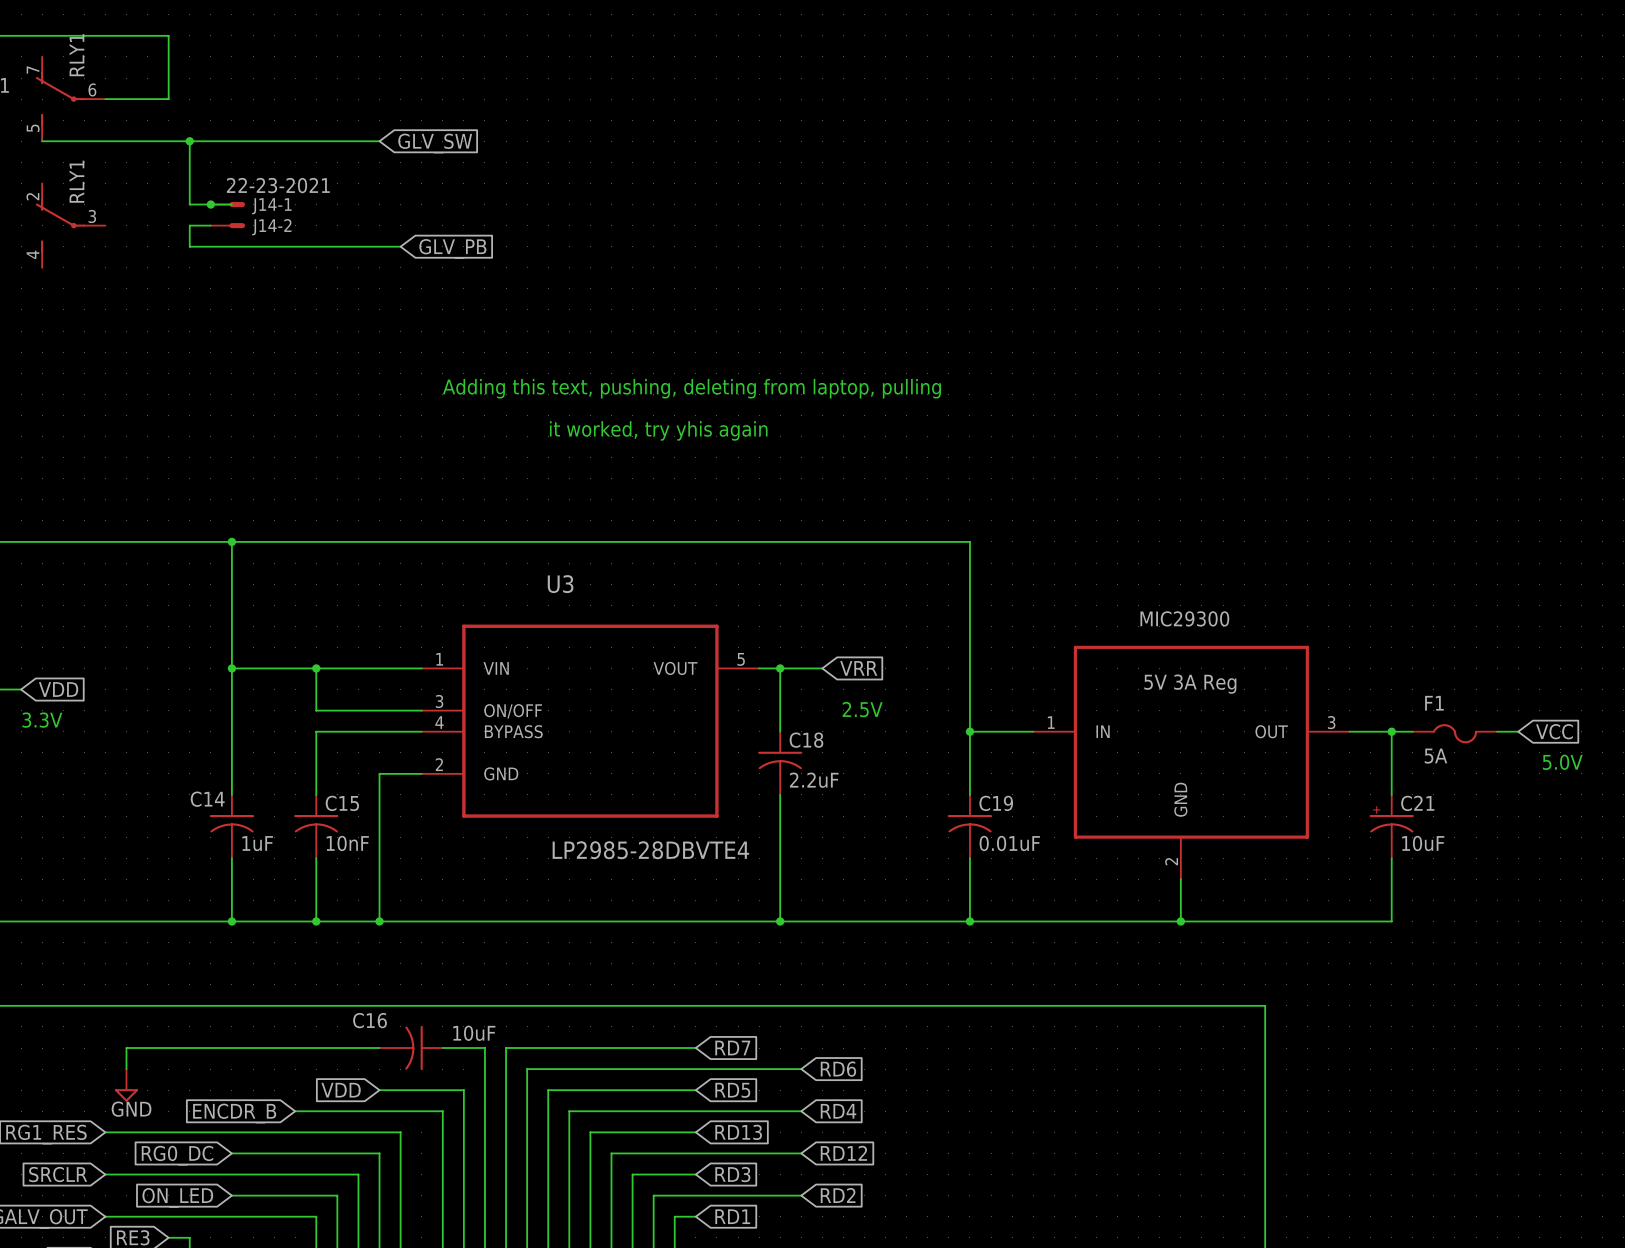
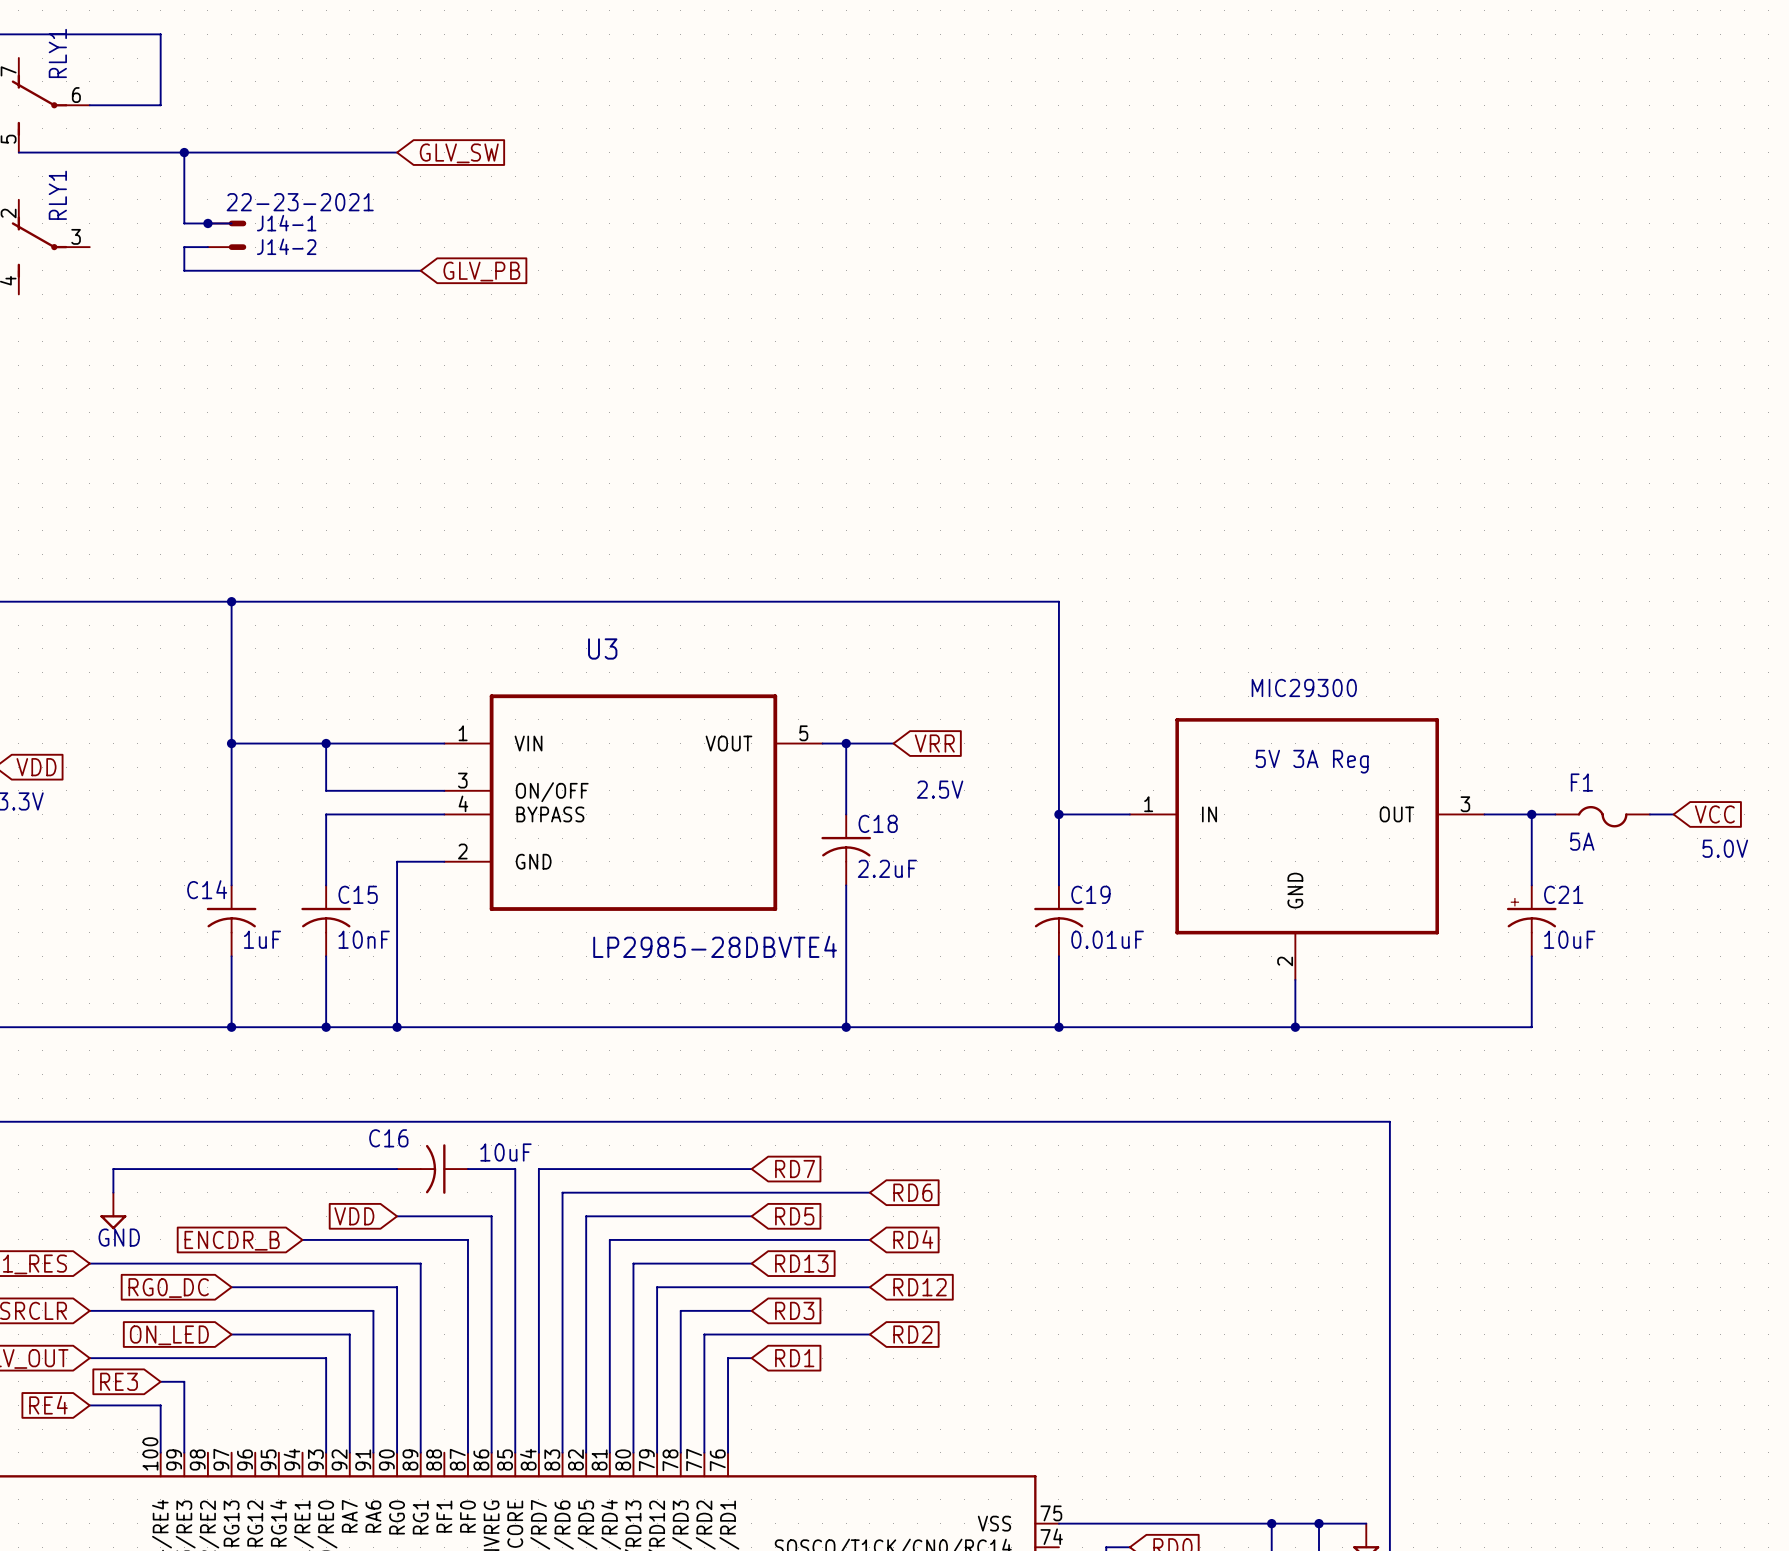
text: Adding this text, pushing, deleting from laptop, pulling (691, 388) -> none
text: it worked, try yhis again (658, 430) -> none

